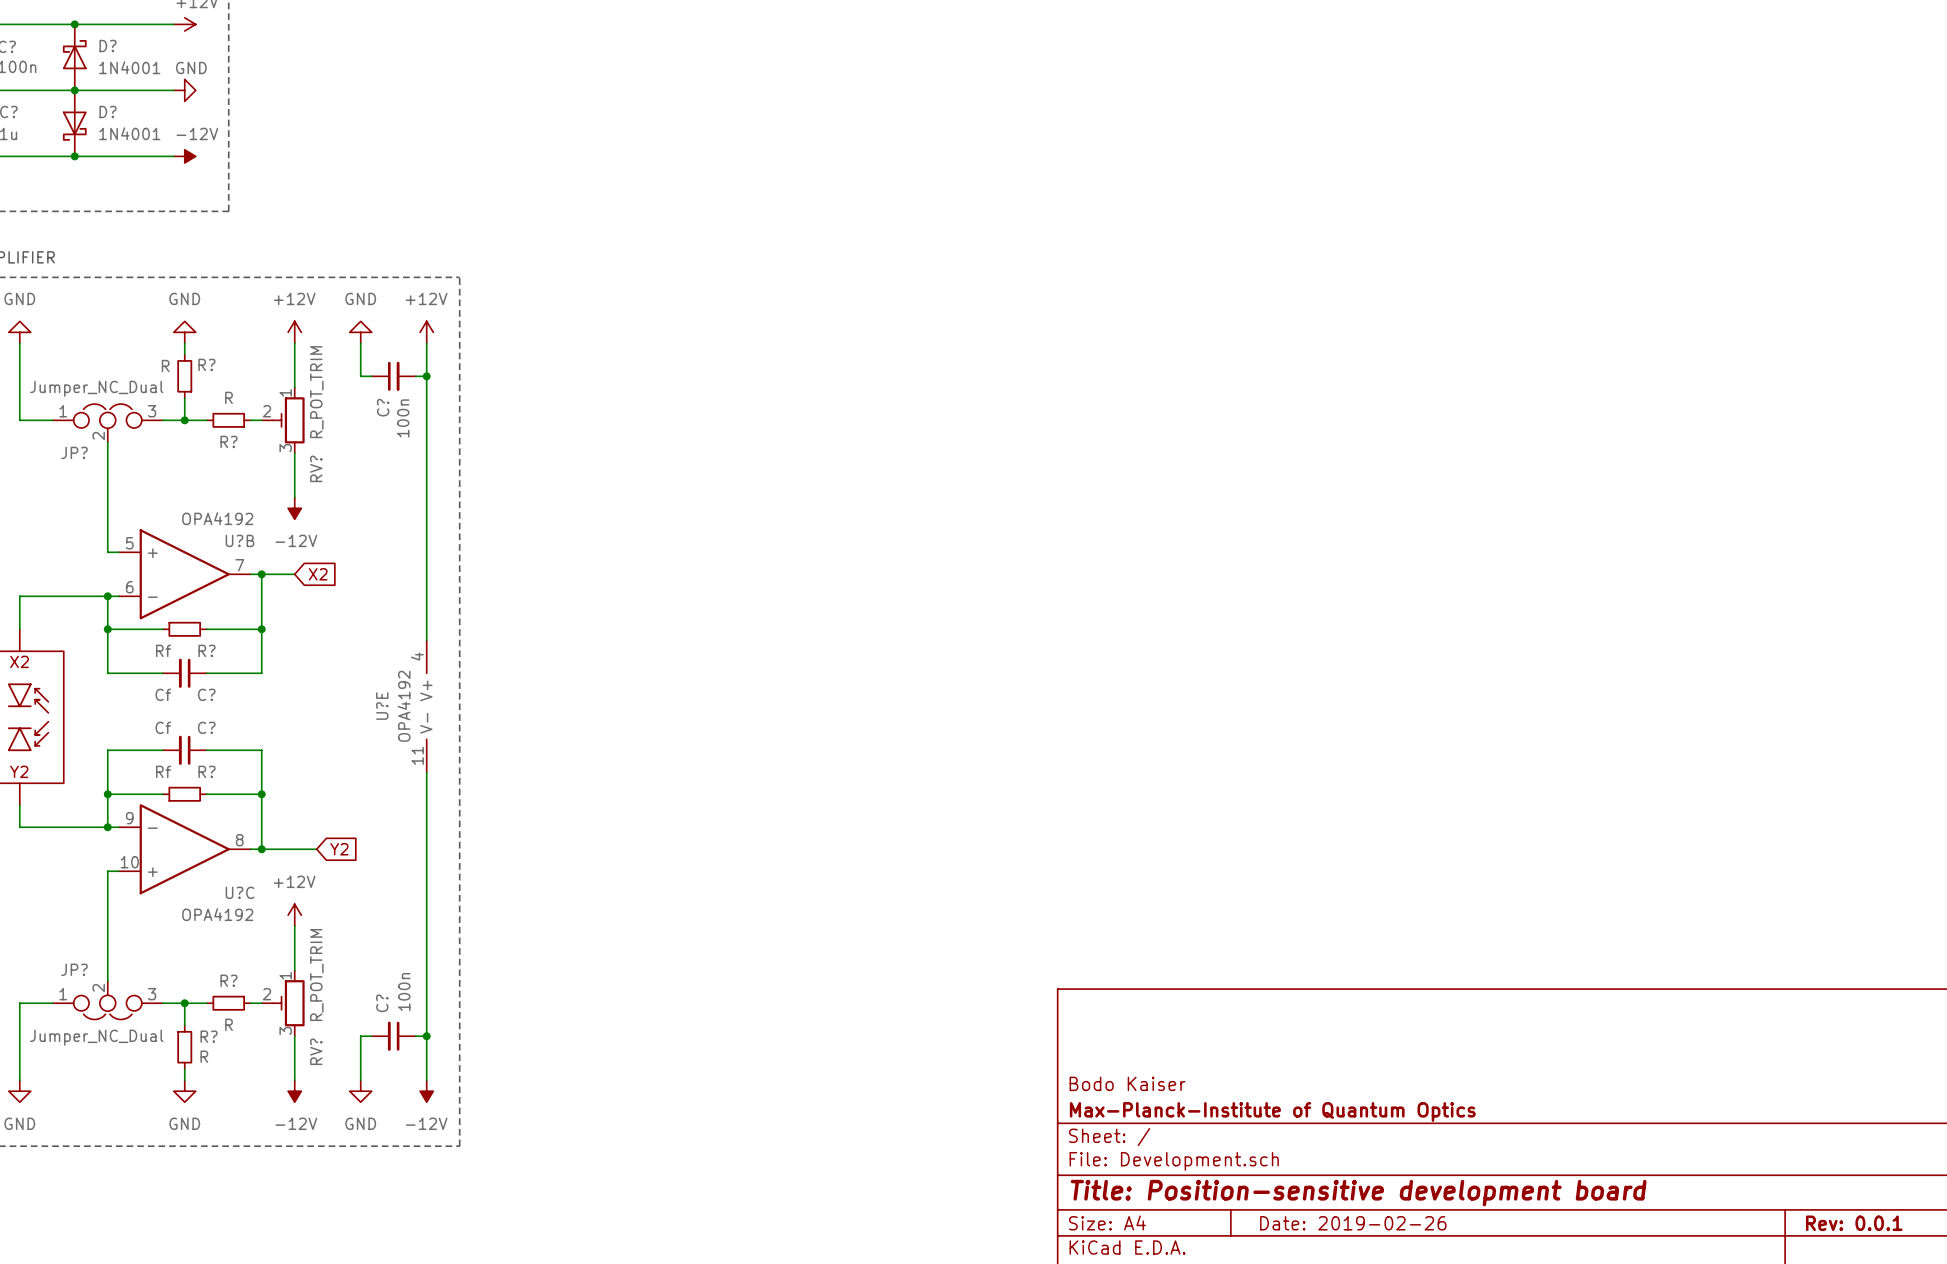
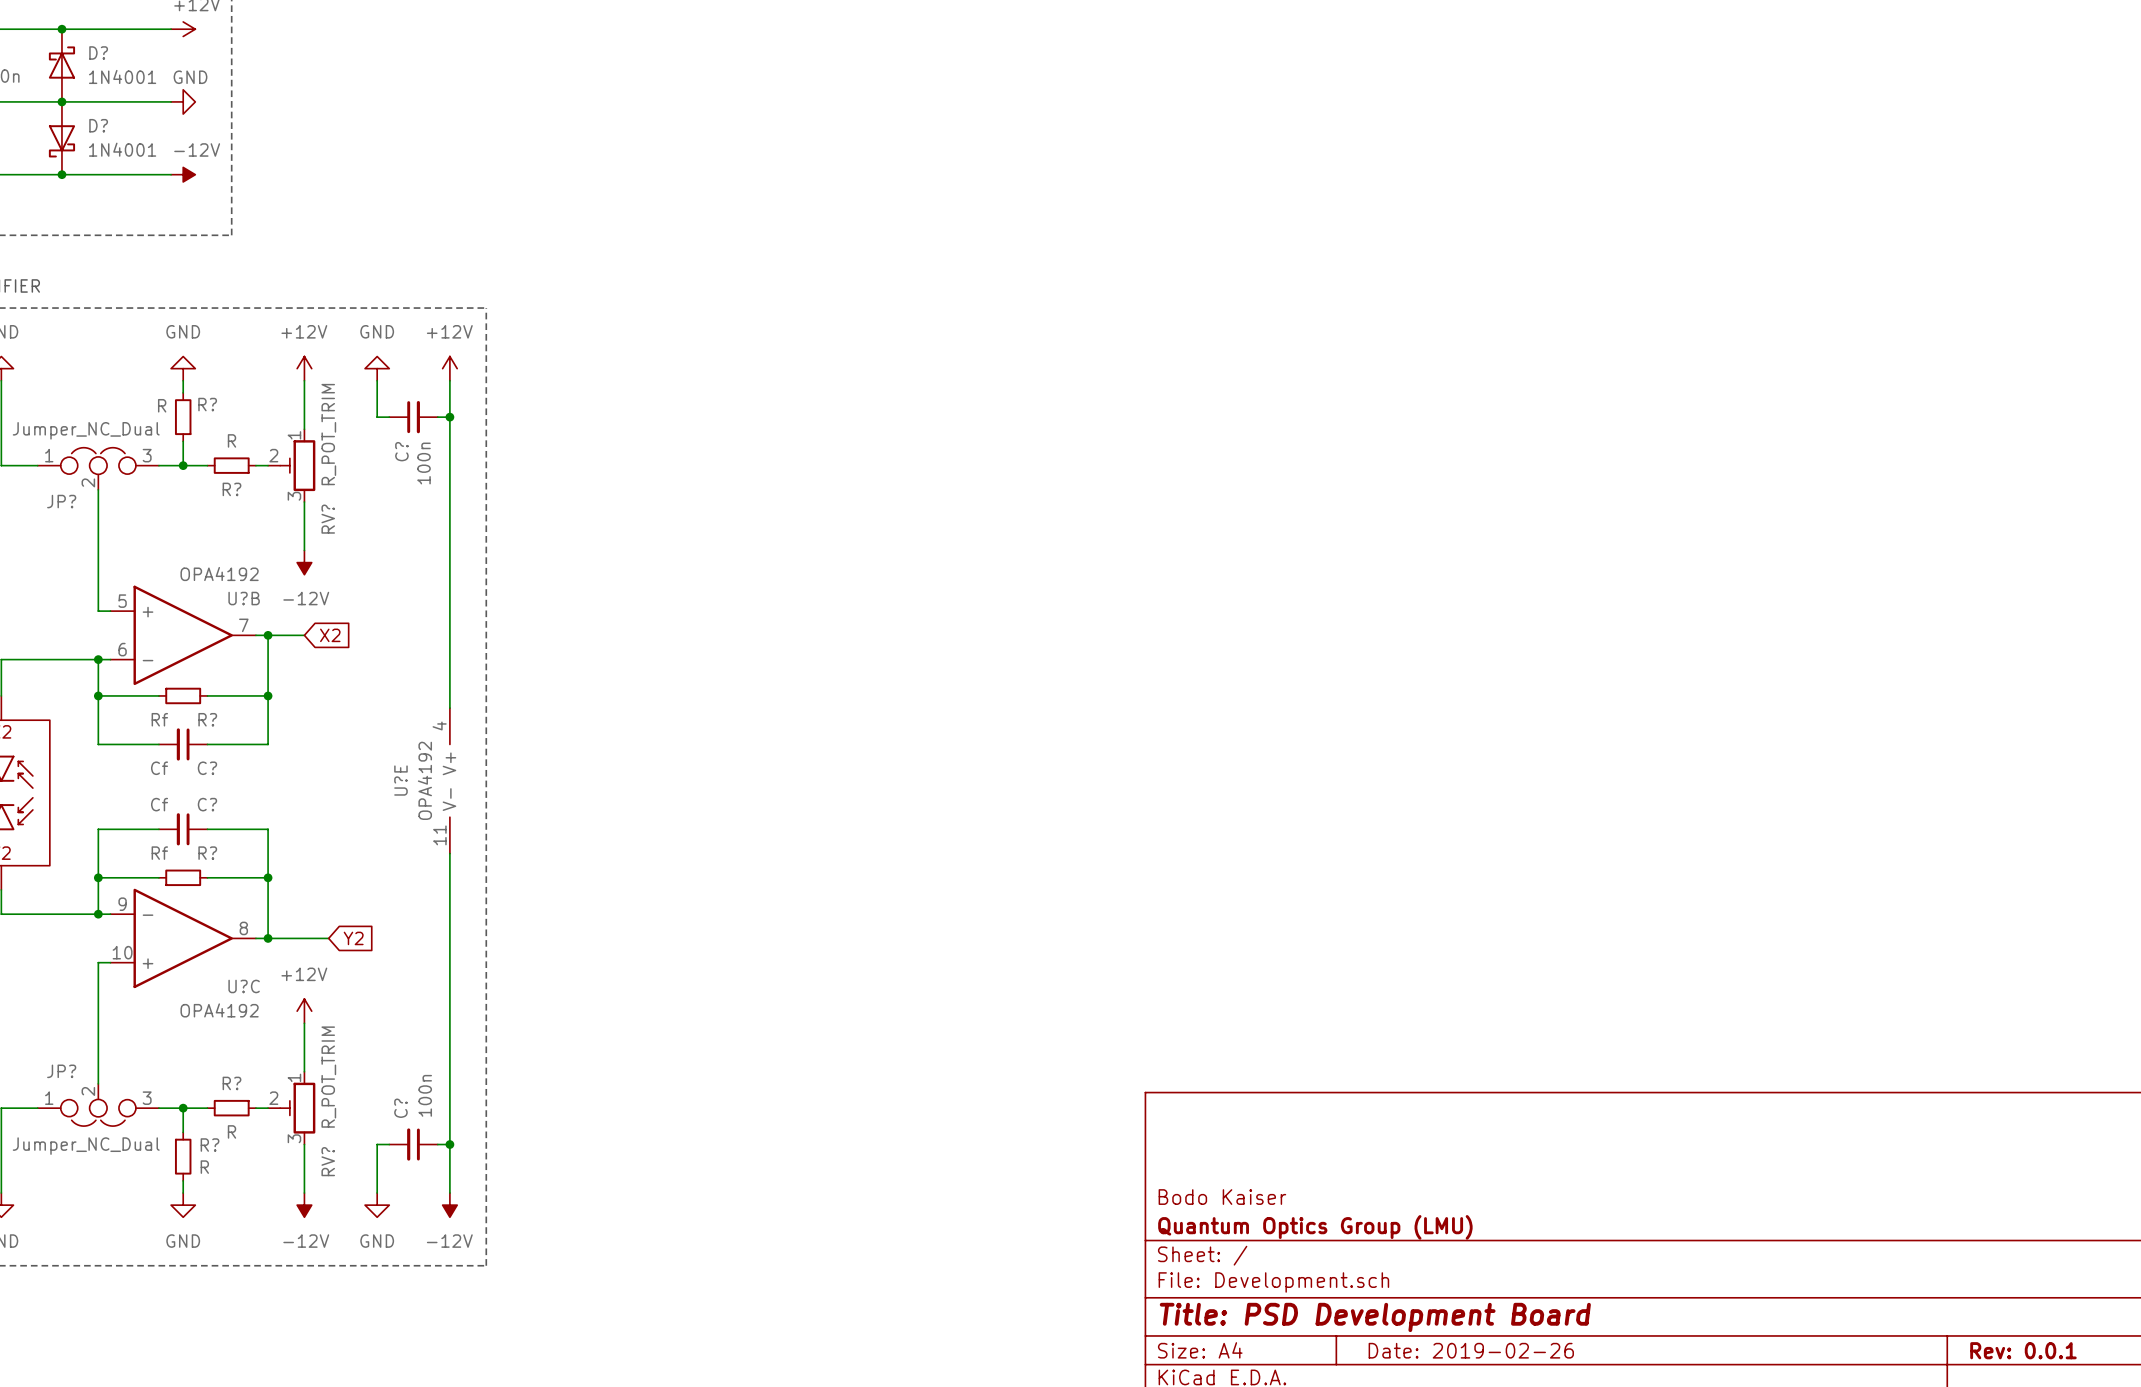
title block: Max-Planck-Institute of Quantum Optics (1272, 1112) -> Quantum Optics Group (LMU) (1315, 1227)
title block: Title: Position-sensitive development board (1358, 1193) -> Title: PSD Development Board (1375, 1317)

